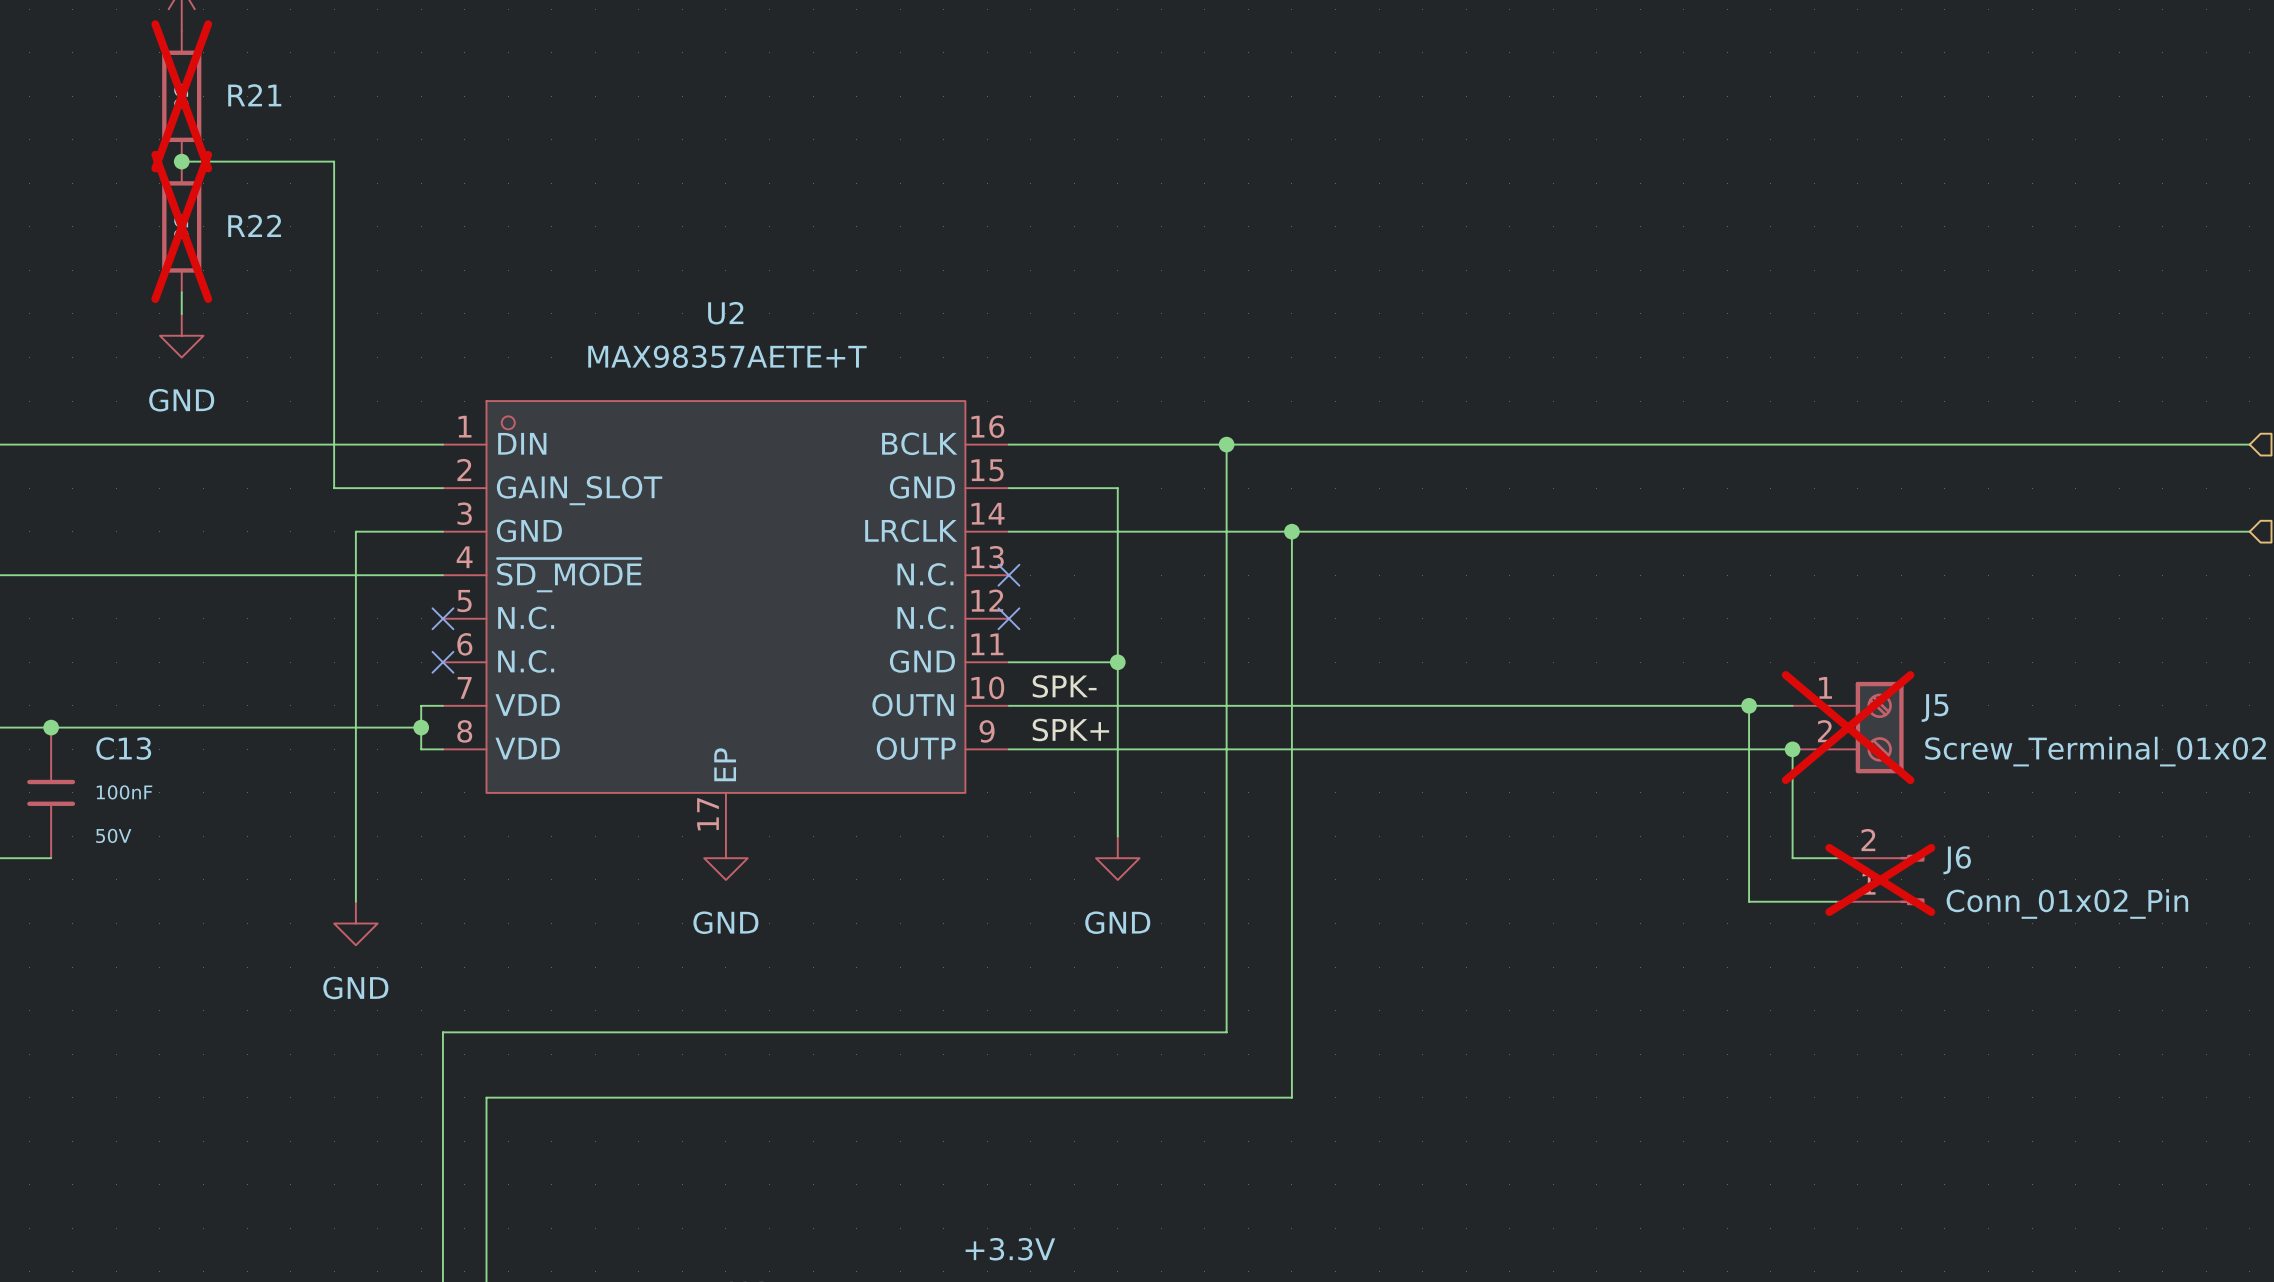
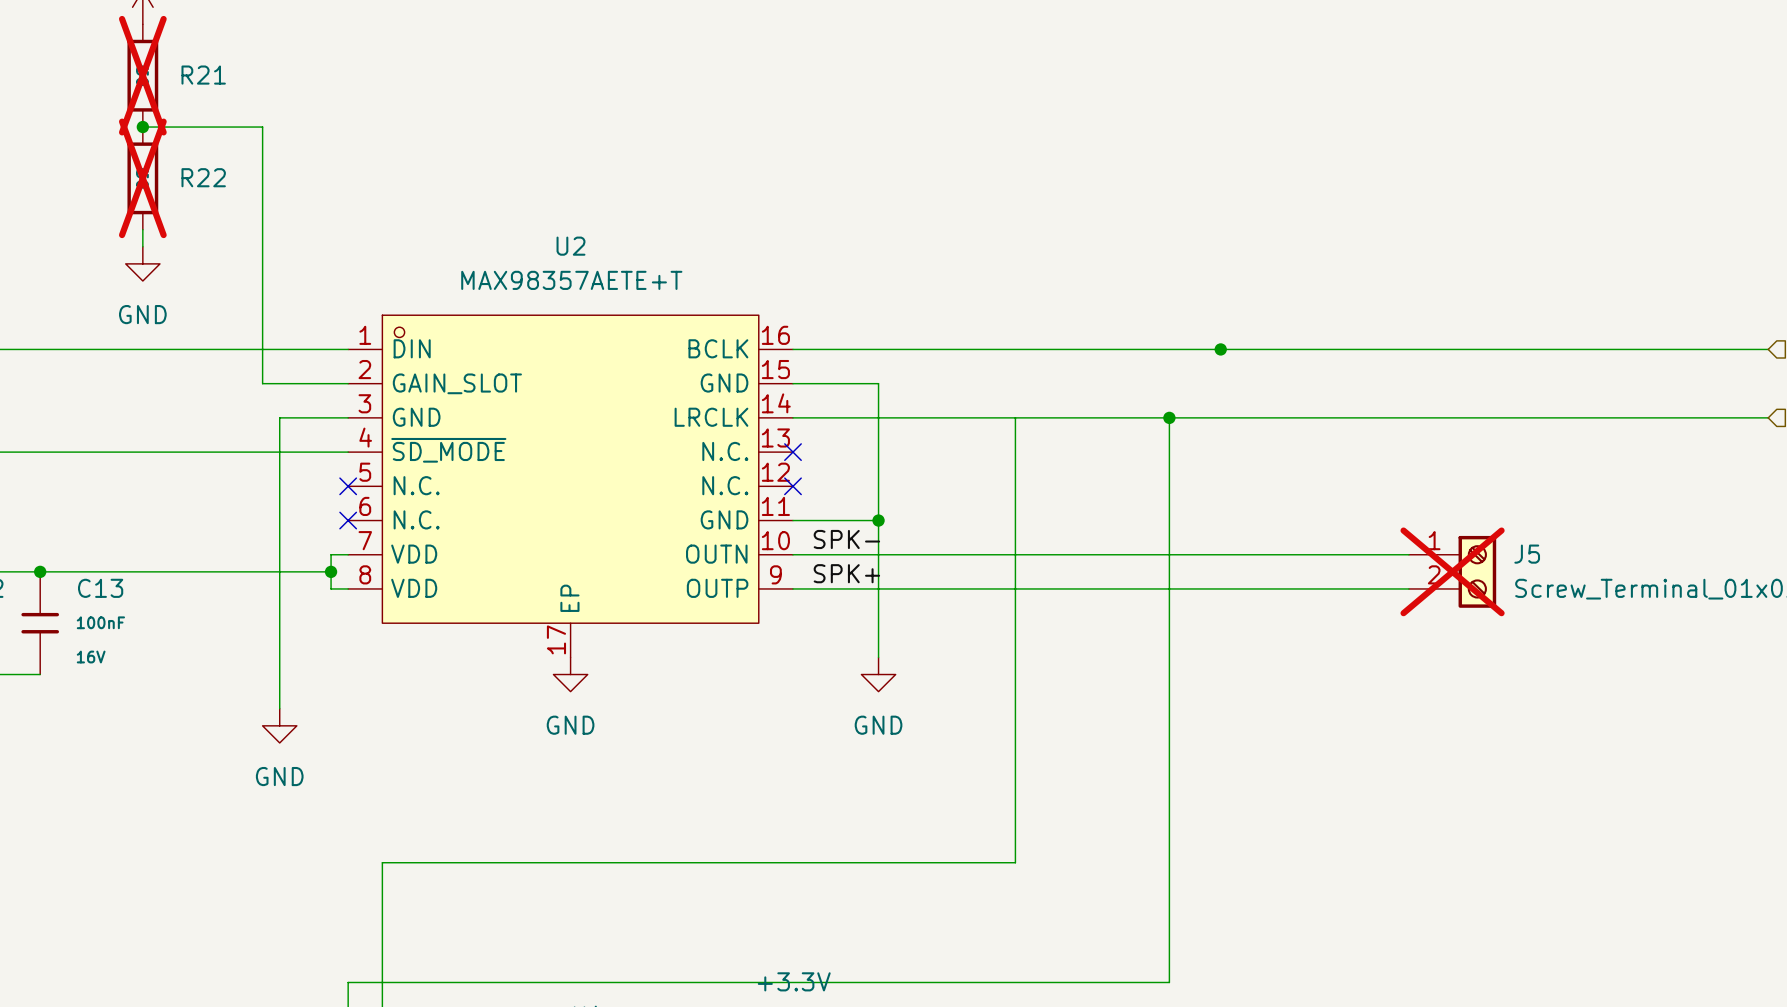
wire: (1226, 444) (1226, 1032) (442, 1032) (442, 1250) -> (1169, 417) (1169, 982) (348, 982)
junction: (1226, 444) -> none
junction: none -> (1220, 349)
junction: (1291, 531) -> none
junction: none -> (1169, 417)
wire: (1749, 705) (1749, 901) (1836, 901) -> none
junction: (1749, 705) -> none
wire: (1792, 749) (1792, 858) (1836, 858) -> none
junction: (1792, 749) -> none
C13 text: 50V (113, 835) -> 16V (91, 657)
J6: Conn_01x02_Pin (1880, 879) -> none

